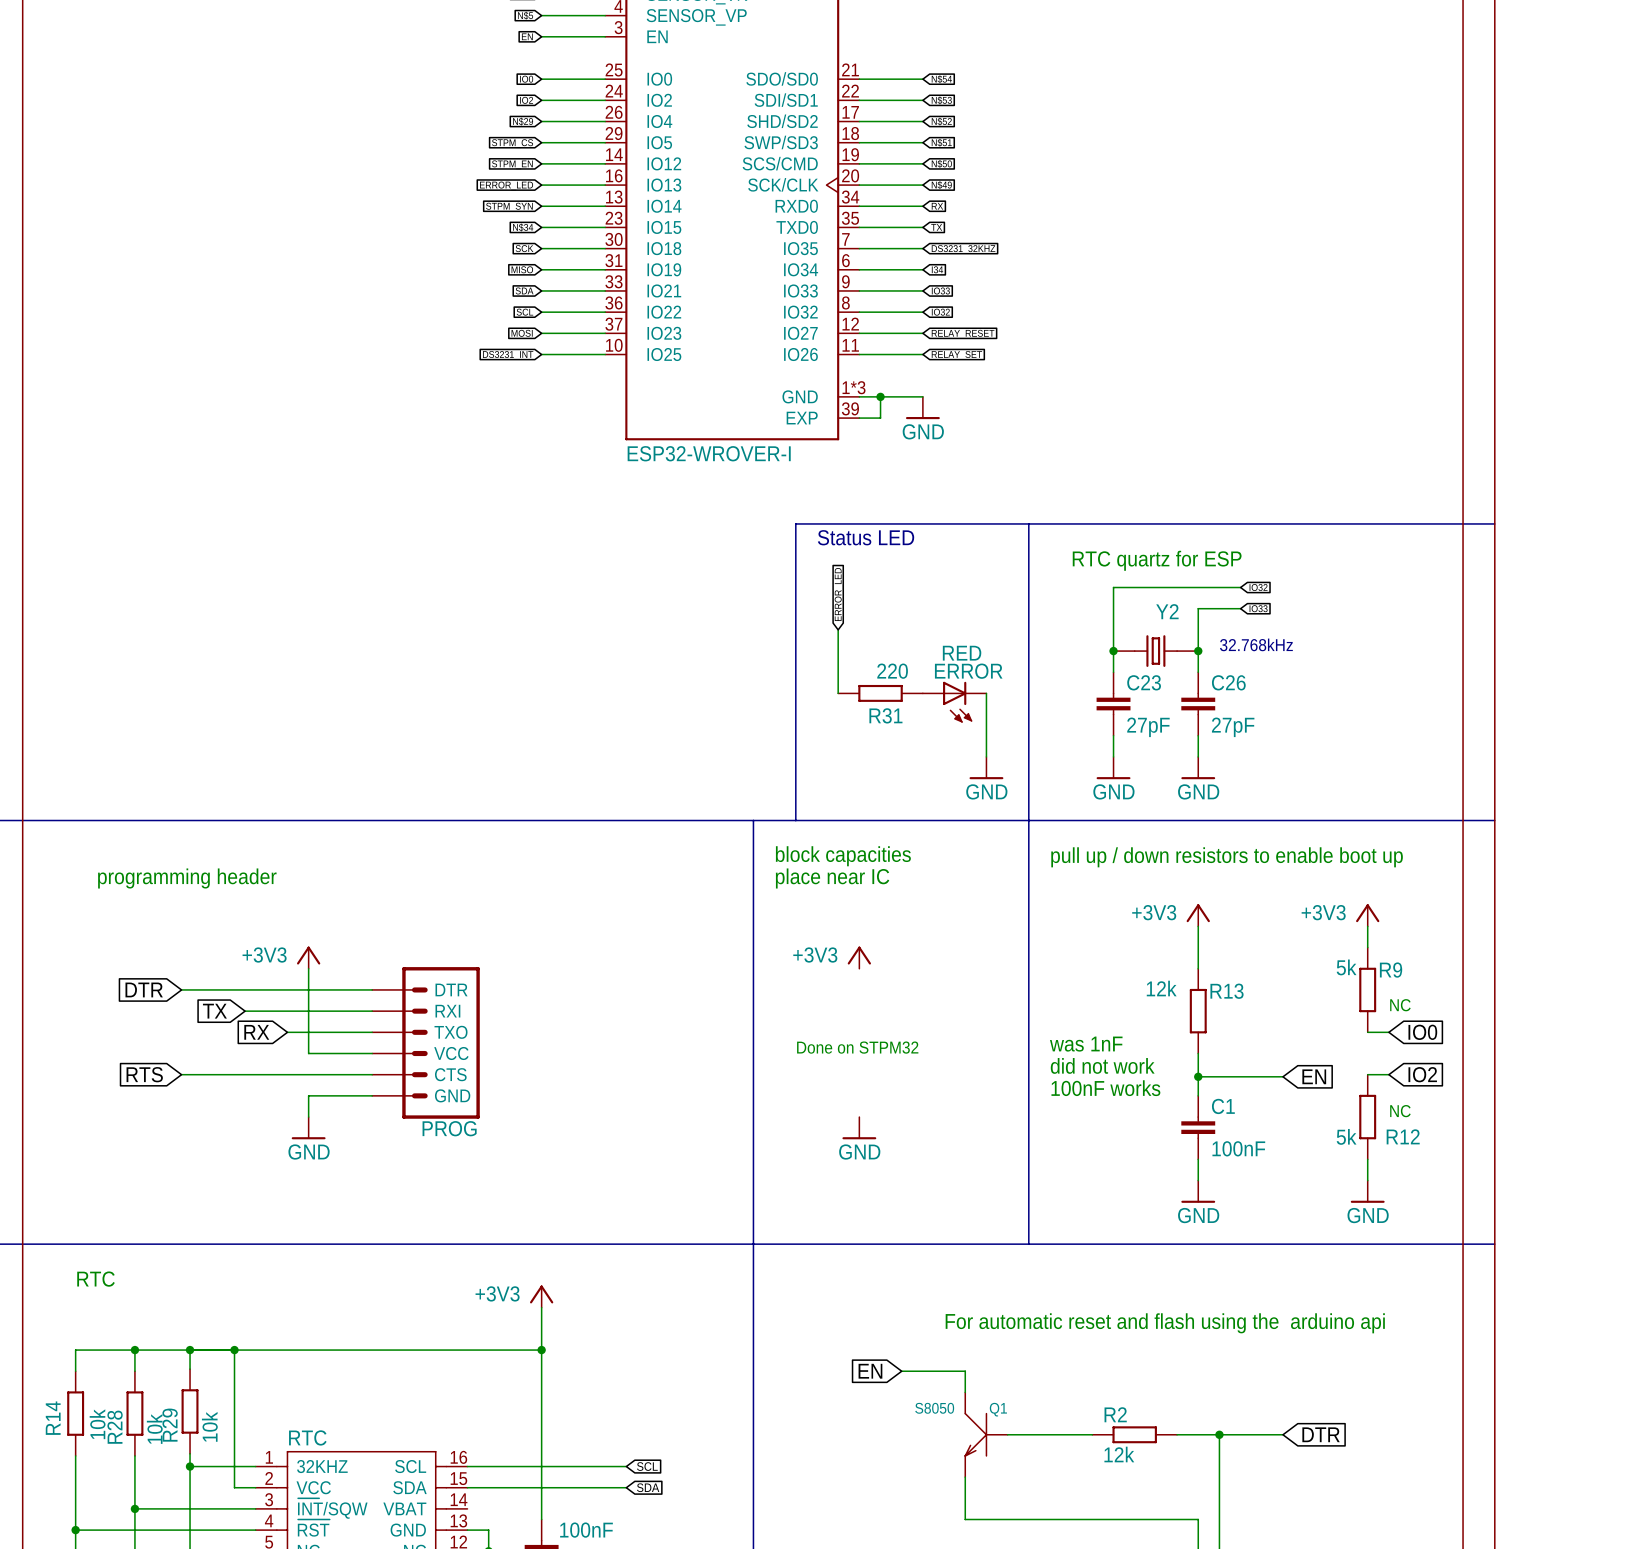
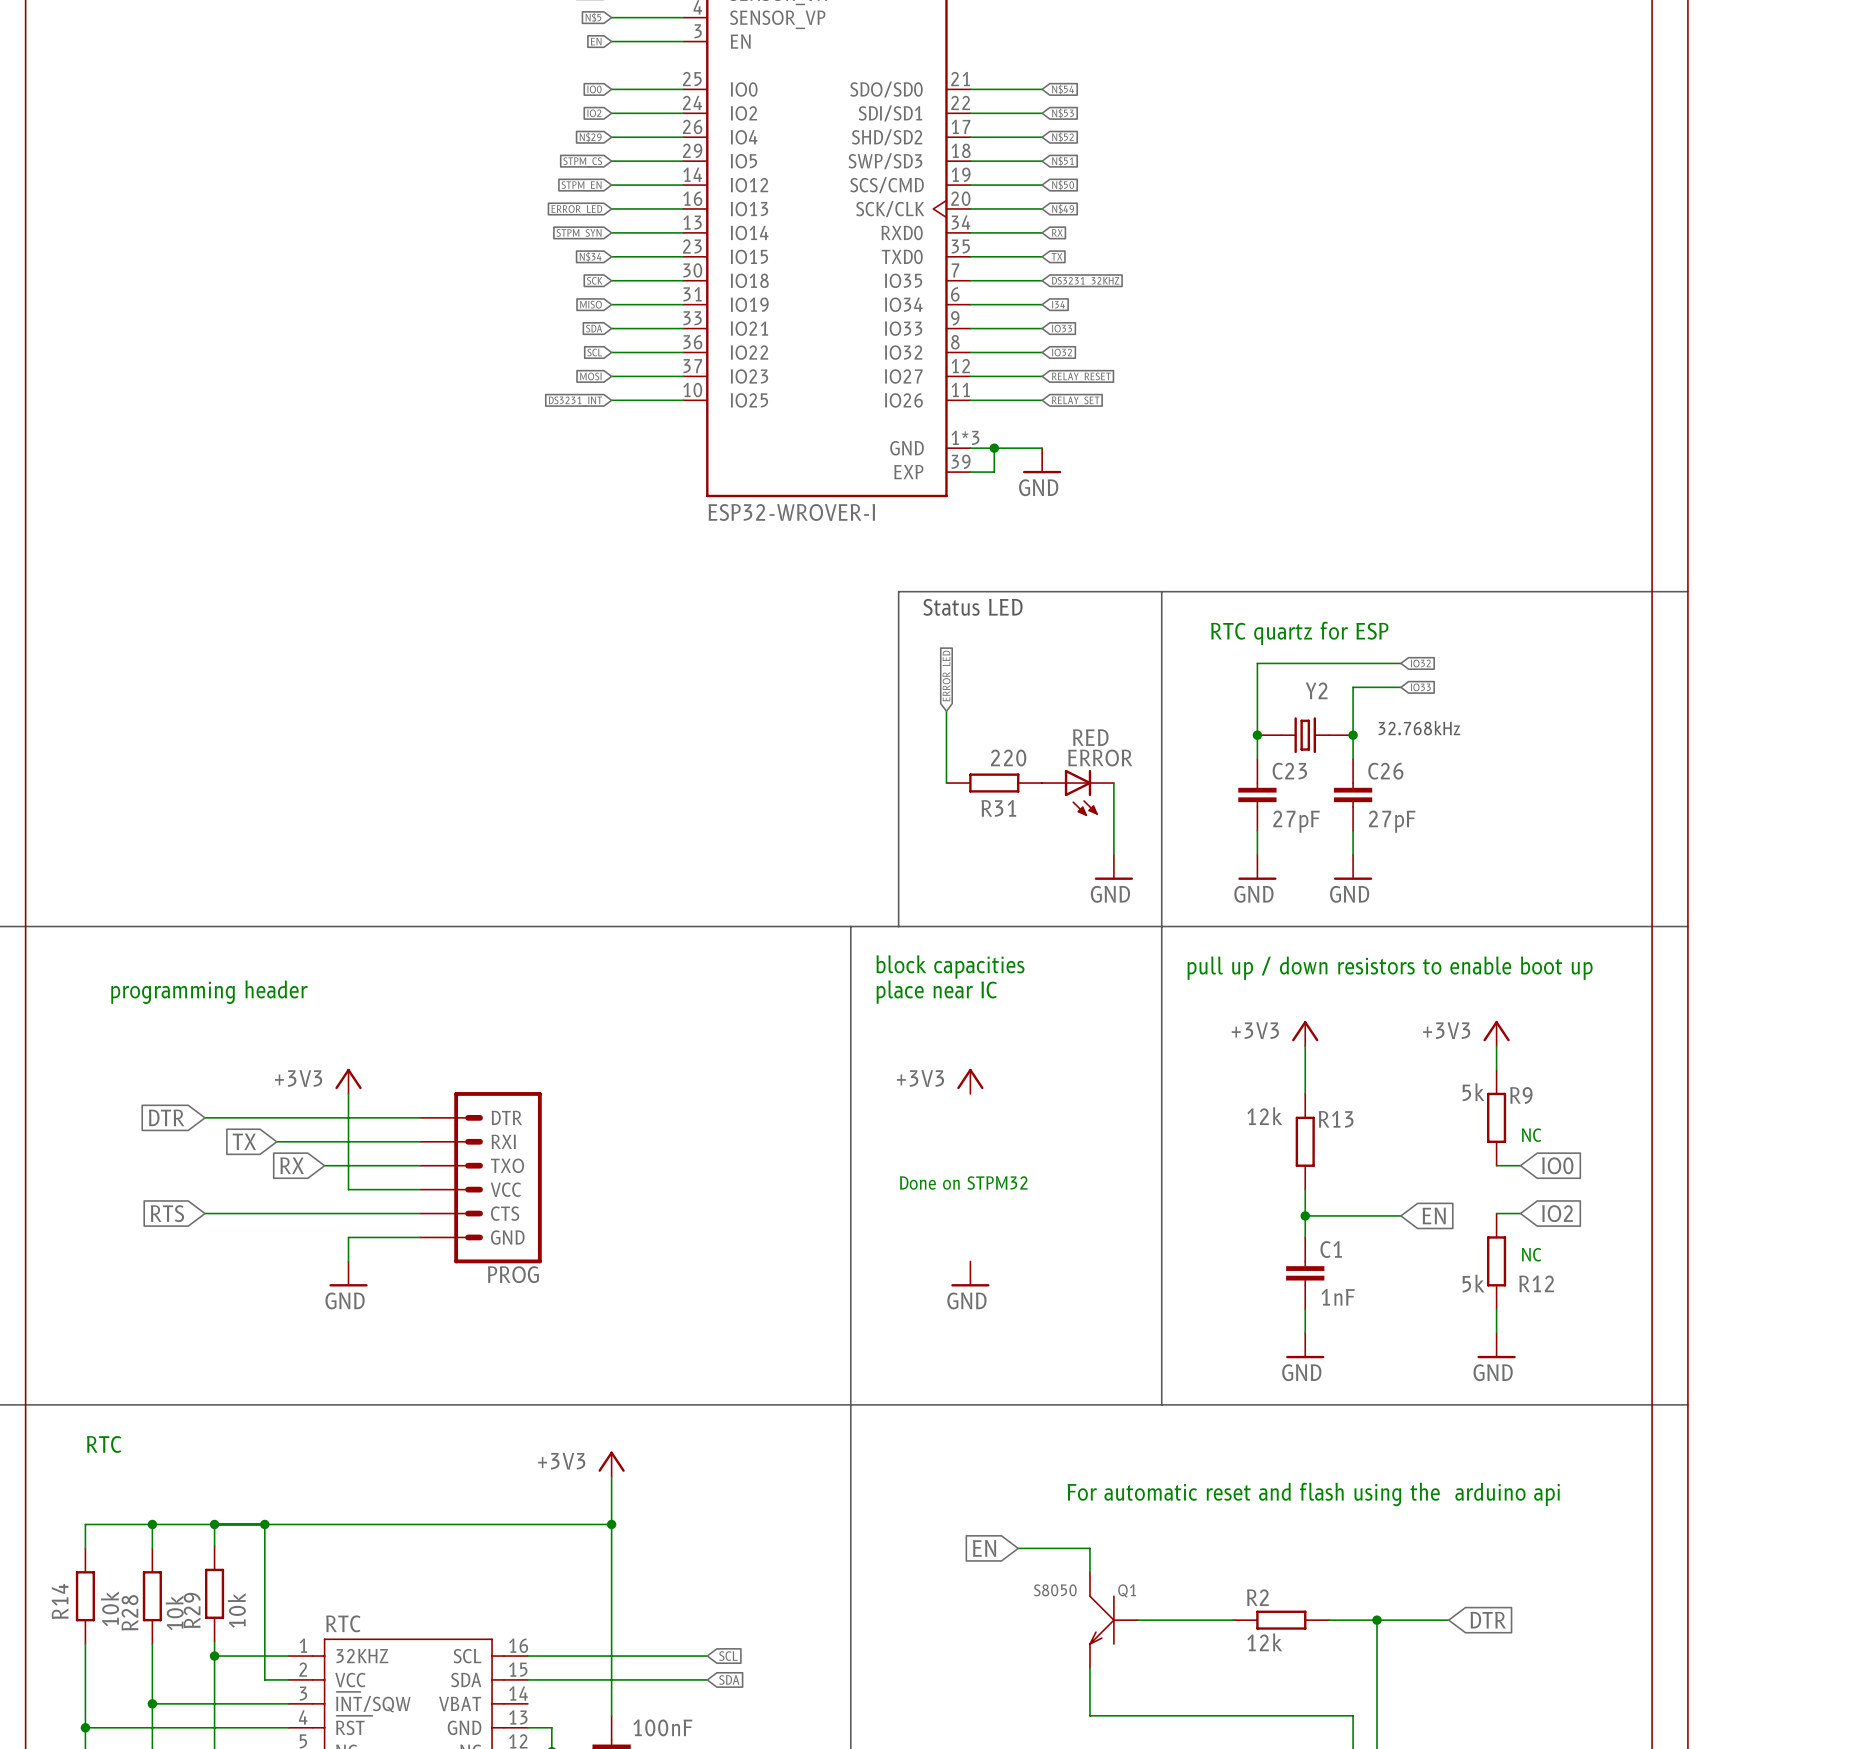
power symbol position: +3V3 (1198, 915) -> +3V3 (1305, 1033)
power symbol position: +3V3 (1367, 915) -> +3V3 (1496, 1033)
wire: (1198, 926) (1198, 968) -> (1305, 1046) (1305, 1093)
wire: (1367, 926) (1367, 947) -> (1496, 1046) (1496, 1070)
R9 position: (1367, 989) -> (1496, 1117)
text position: NC (1400, 1005) -> NC (1531, 1135)
R13 position: (1198, 1011) -> (1305, 1141)
wire: (1367, 1032) (1388, 1032) -> (1496, 1165) (1520, 1165)
global label position: IO0 (1422, 1032) -> IO0 (1557, 1165)
text: was 1nF (1086, 1044) -> none
wire: (1198, 1053) (1198, 1095) -> (1305, 1189) (1305, 1237)
text: did not work (1102, 1065) -> none
wire: (1367, 1074) (1388, 1074) -> (1496, 1213) (1520, 1213)
global label position: IO2 (1422, 1074) -> IO2 (1557, 1213)
junction position: (1198, 1076) -> (1305, 1215)
wire: (1240, 1076) (1282, 1076) -> (1305, 1215) (1353, 1215)
global label position: EN (1314, 1076) -> EN (1434, 1215)
text: 100nF works (1105, 1088) -> none
text position: NC (1400, 1111) -> NC (1531, 1254)
R12 position: (1367, 1117) -> (1496, 1261)
C1 position: (1198, 1127) -> (1305, 1273)
C1 value: 100nF (1238, 1148) -> 1nF (1338, 1297)
wire: (1198, 1159) (1198, 1180) -> (1305, 1309) (1305, 1333)
wire: (1367, 1159) (1367, 1180) -> (1496, 1309) (1496, 1333)
power symbol position: GND (1198, 1191) -> GND (1305, 1345)
power symbol position: GND (1367, 1191) -> GND (1496, 1345)

